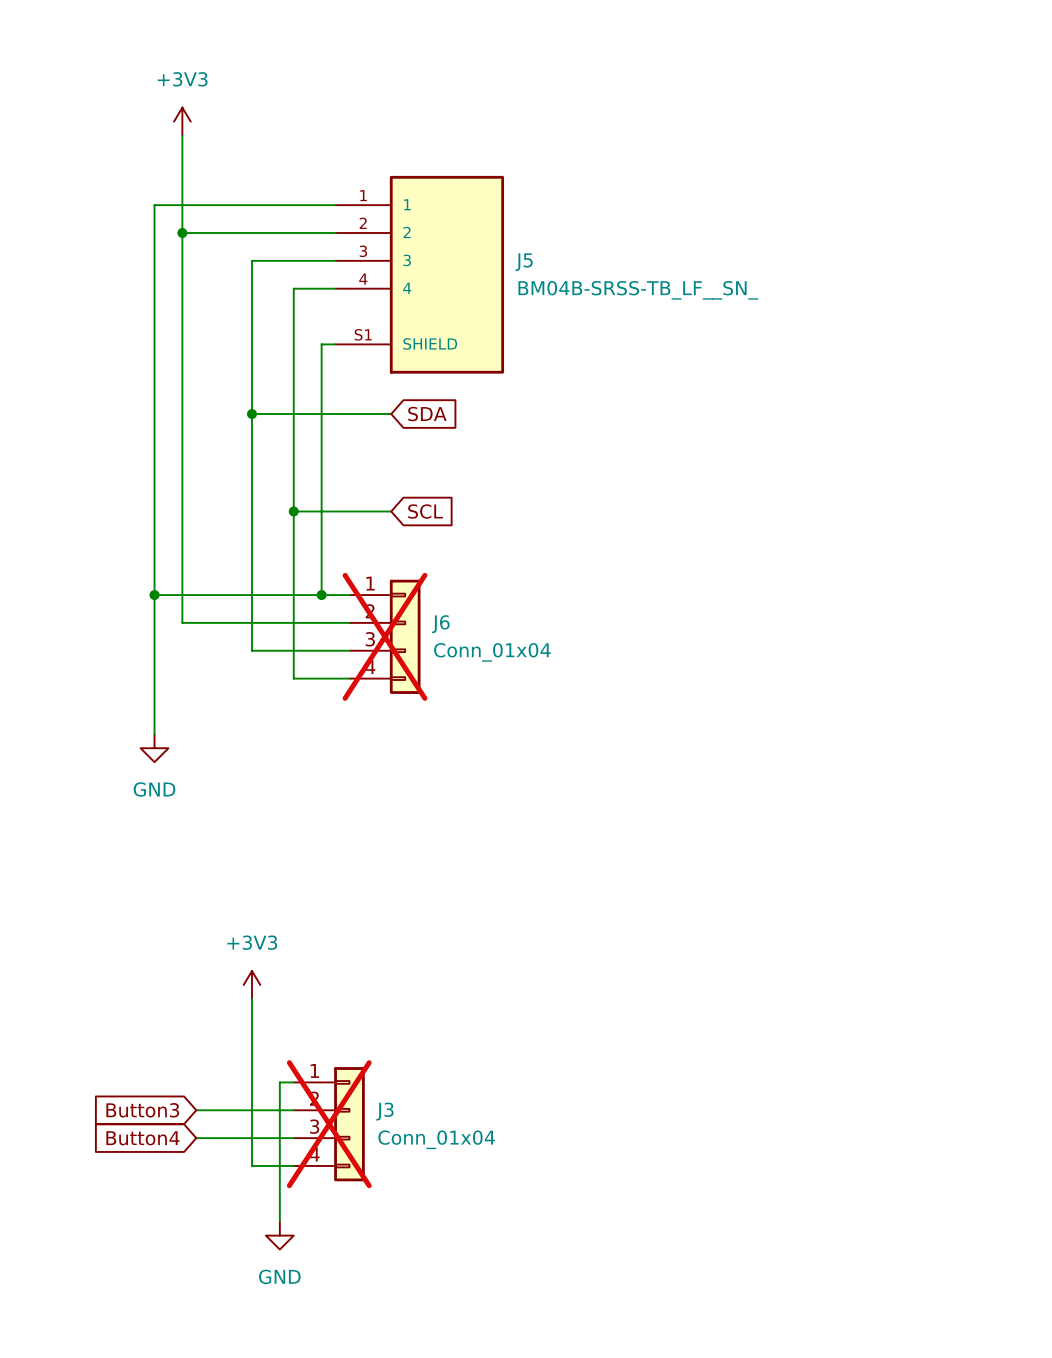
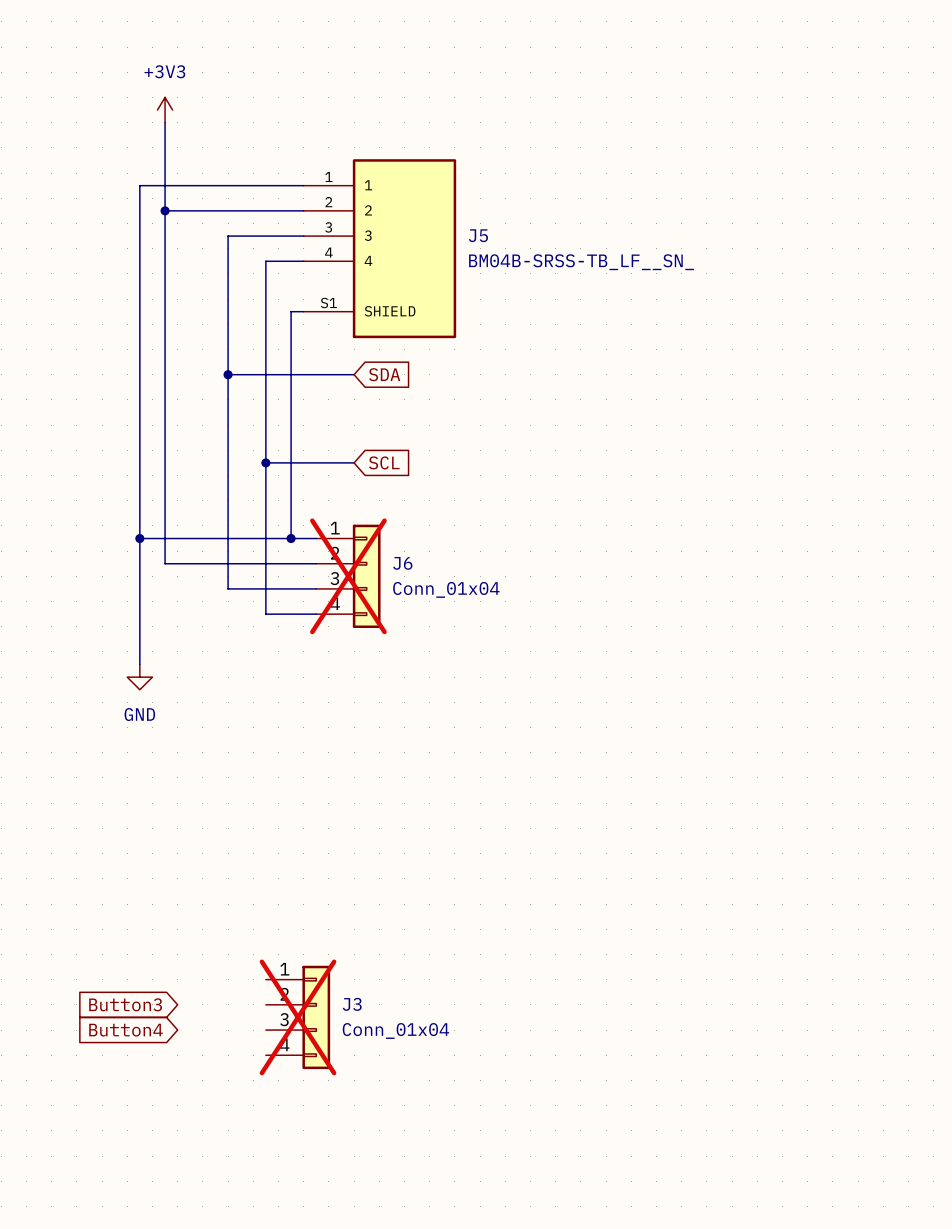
power symbol: +3V3 (252, 984) -> none
wire: (252, 998) (252, 1165) (293, 1165) -> none
wire: (293, 1082) (279, 1082) (279, 1221) -> none
wire: (196, 1110) (293, 1110) -> none
wire: (196, 1138) (293, 1138) -> none
power symbol: GND (279, 1235) -> none

